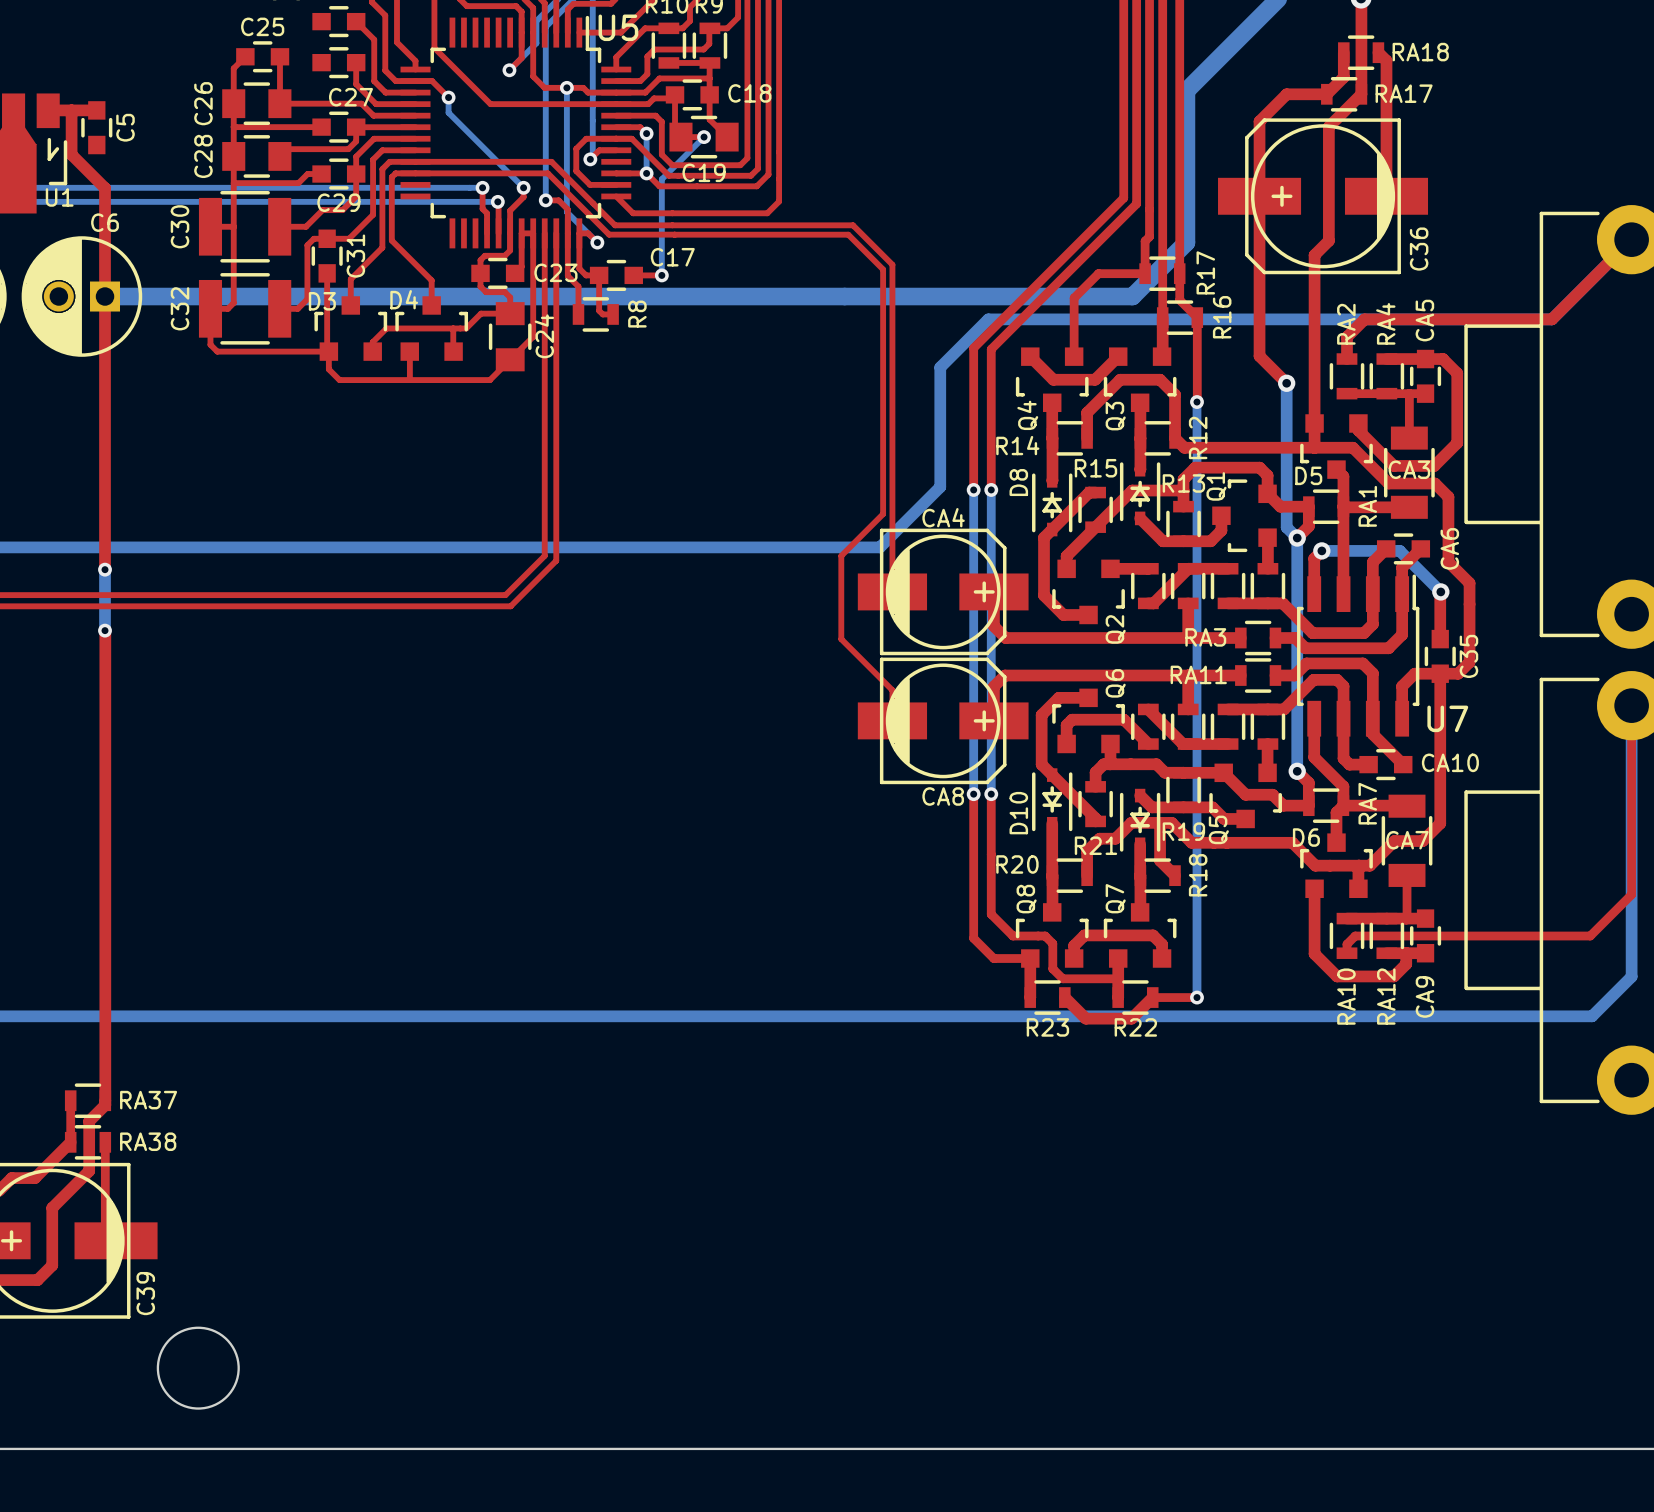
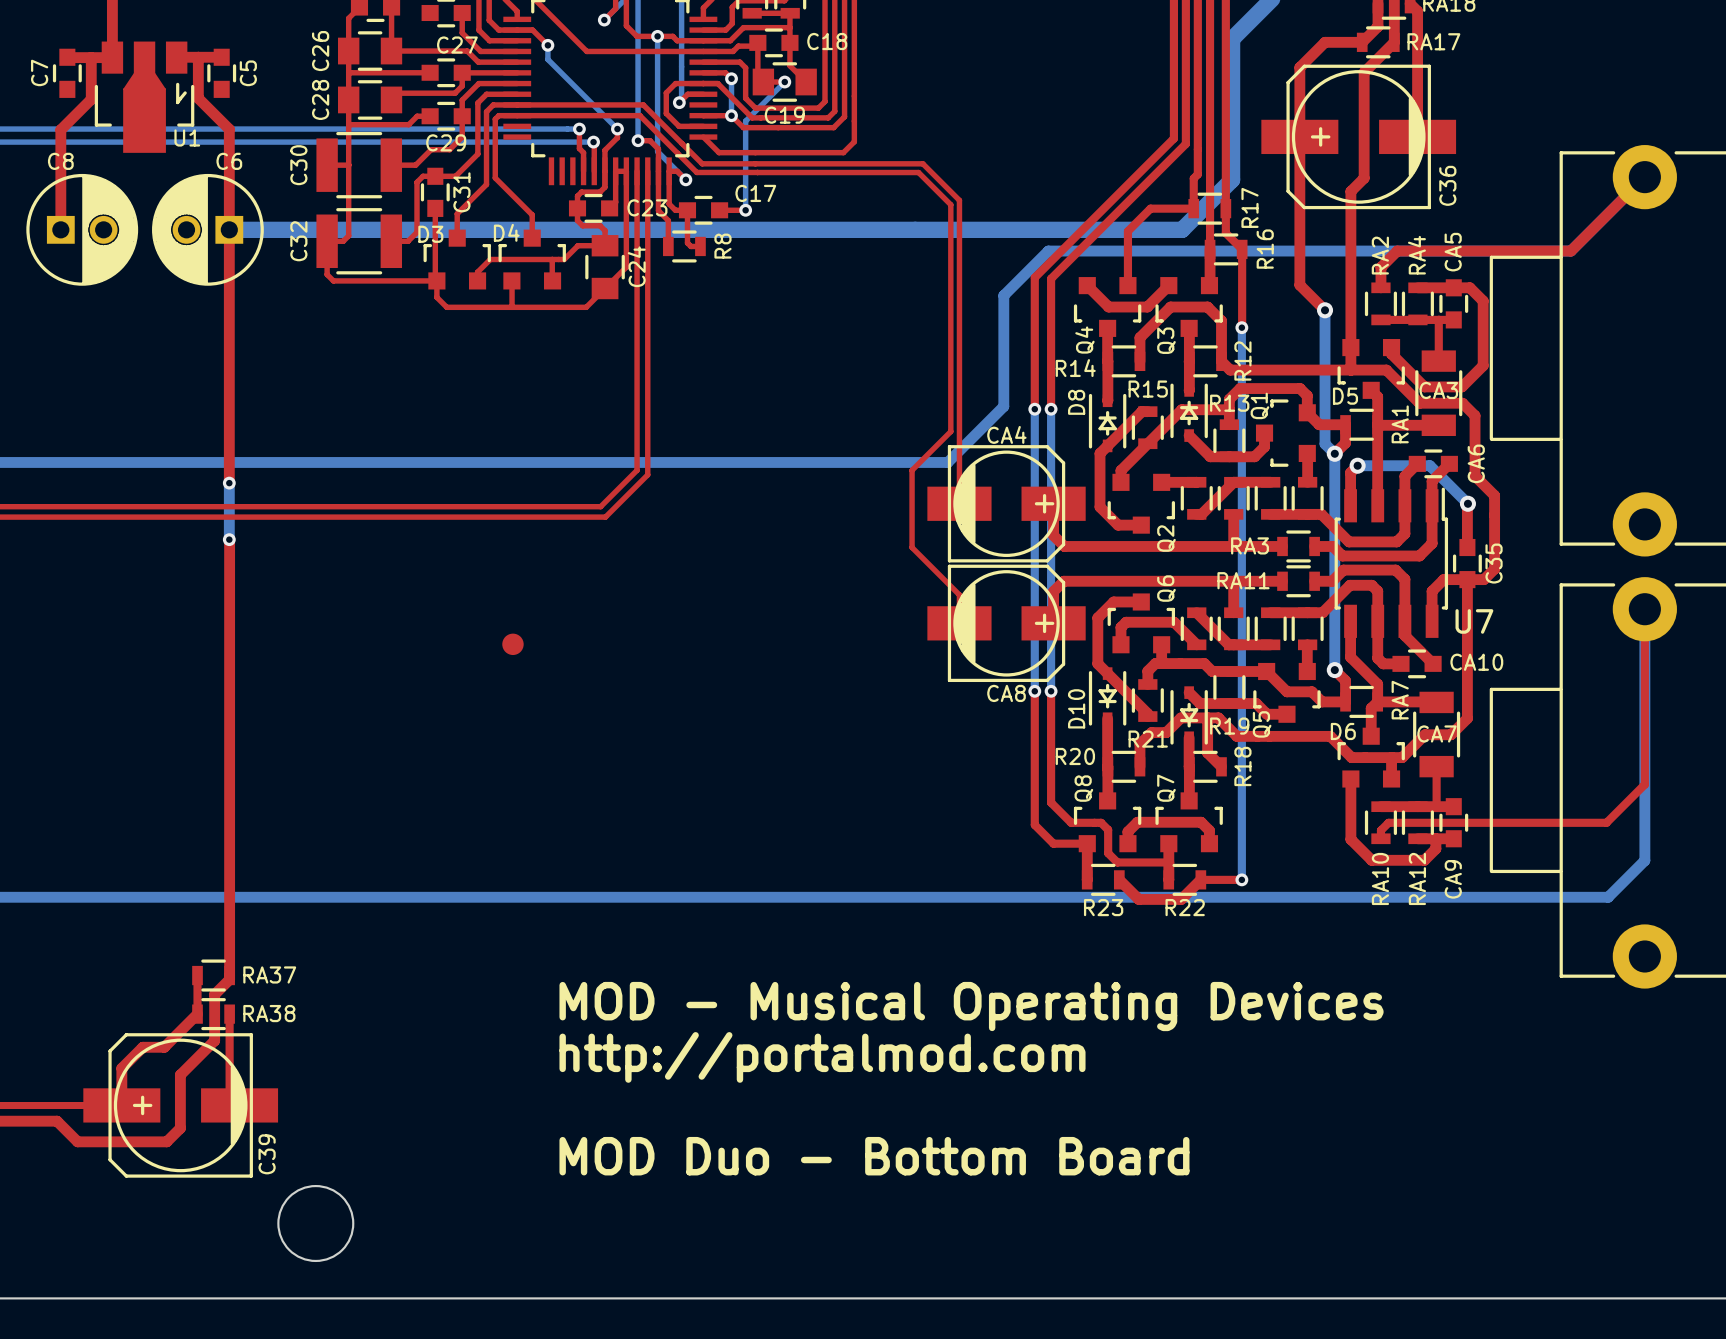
part: none -> (512, 644)
text: none -> MOD - Musical Operating Devices (971, 1006)
text: none -> http://portalmod.com (822, 1057)
text: none -> MOD Duo - Bottom Board (874, 1156)

